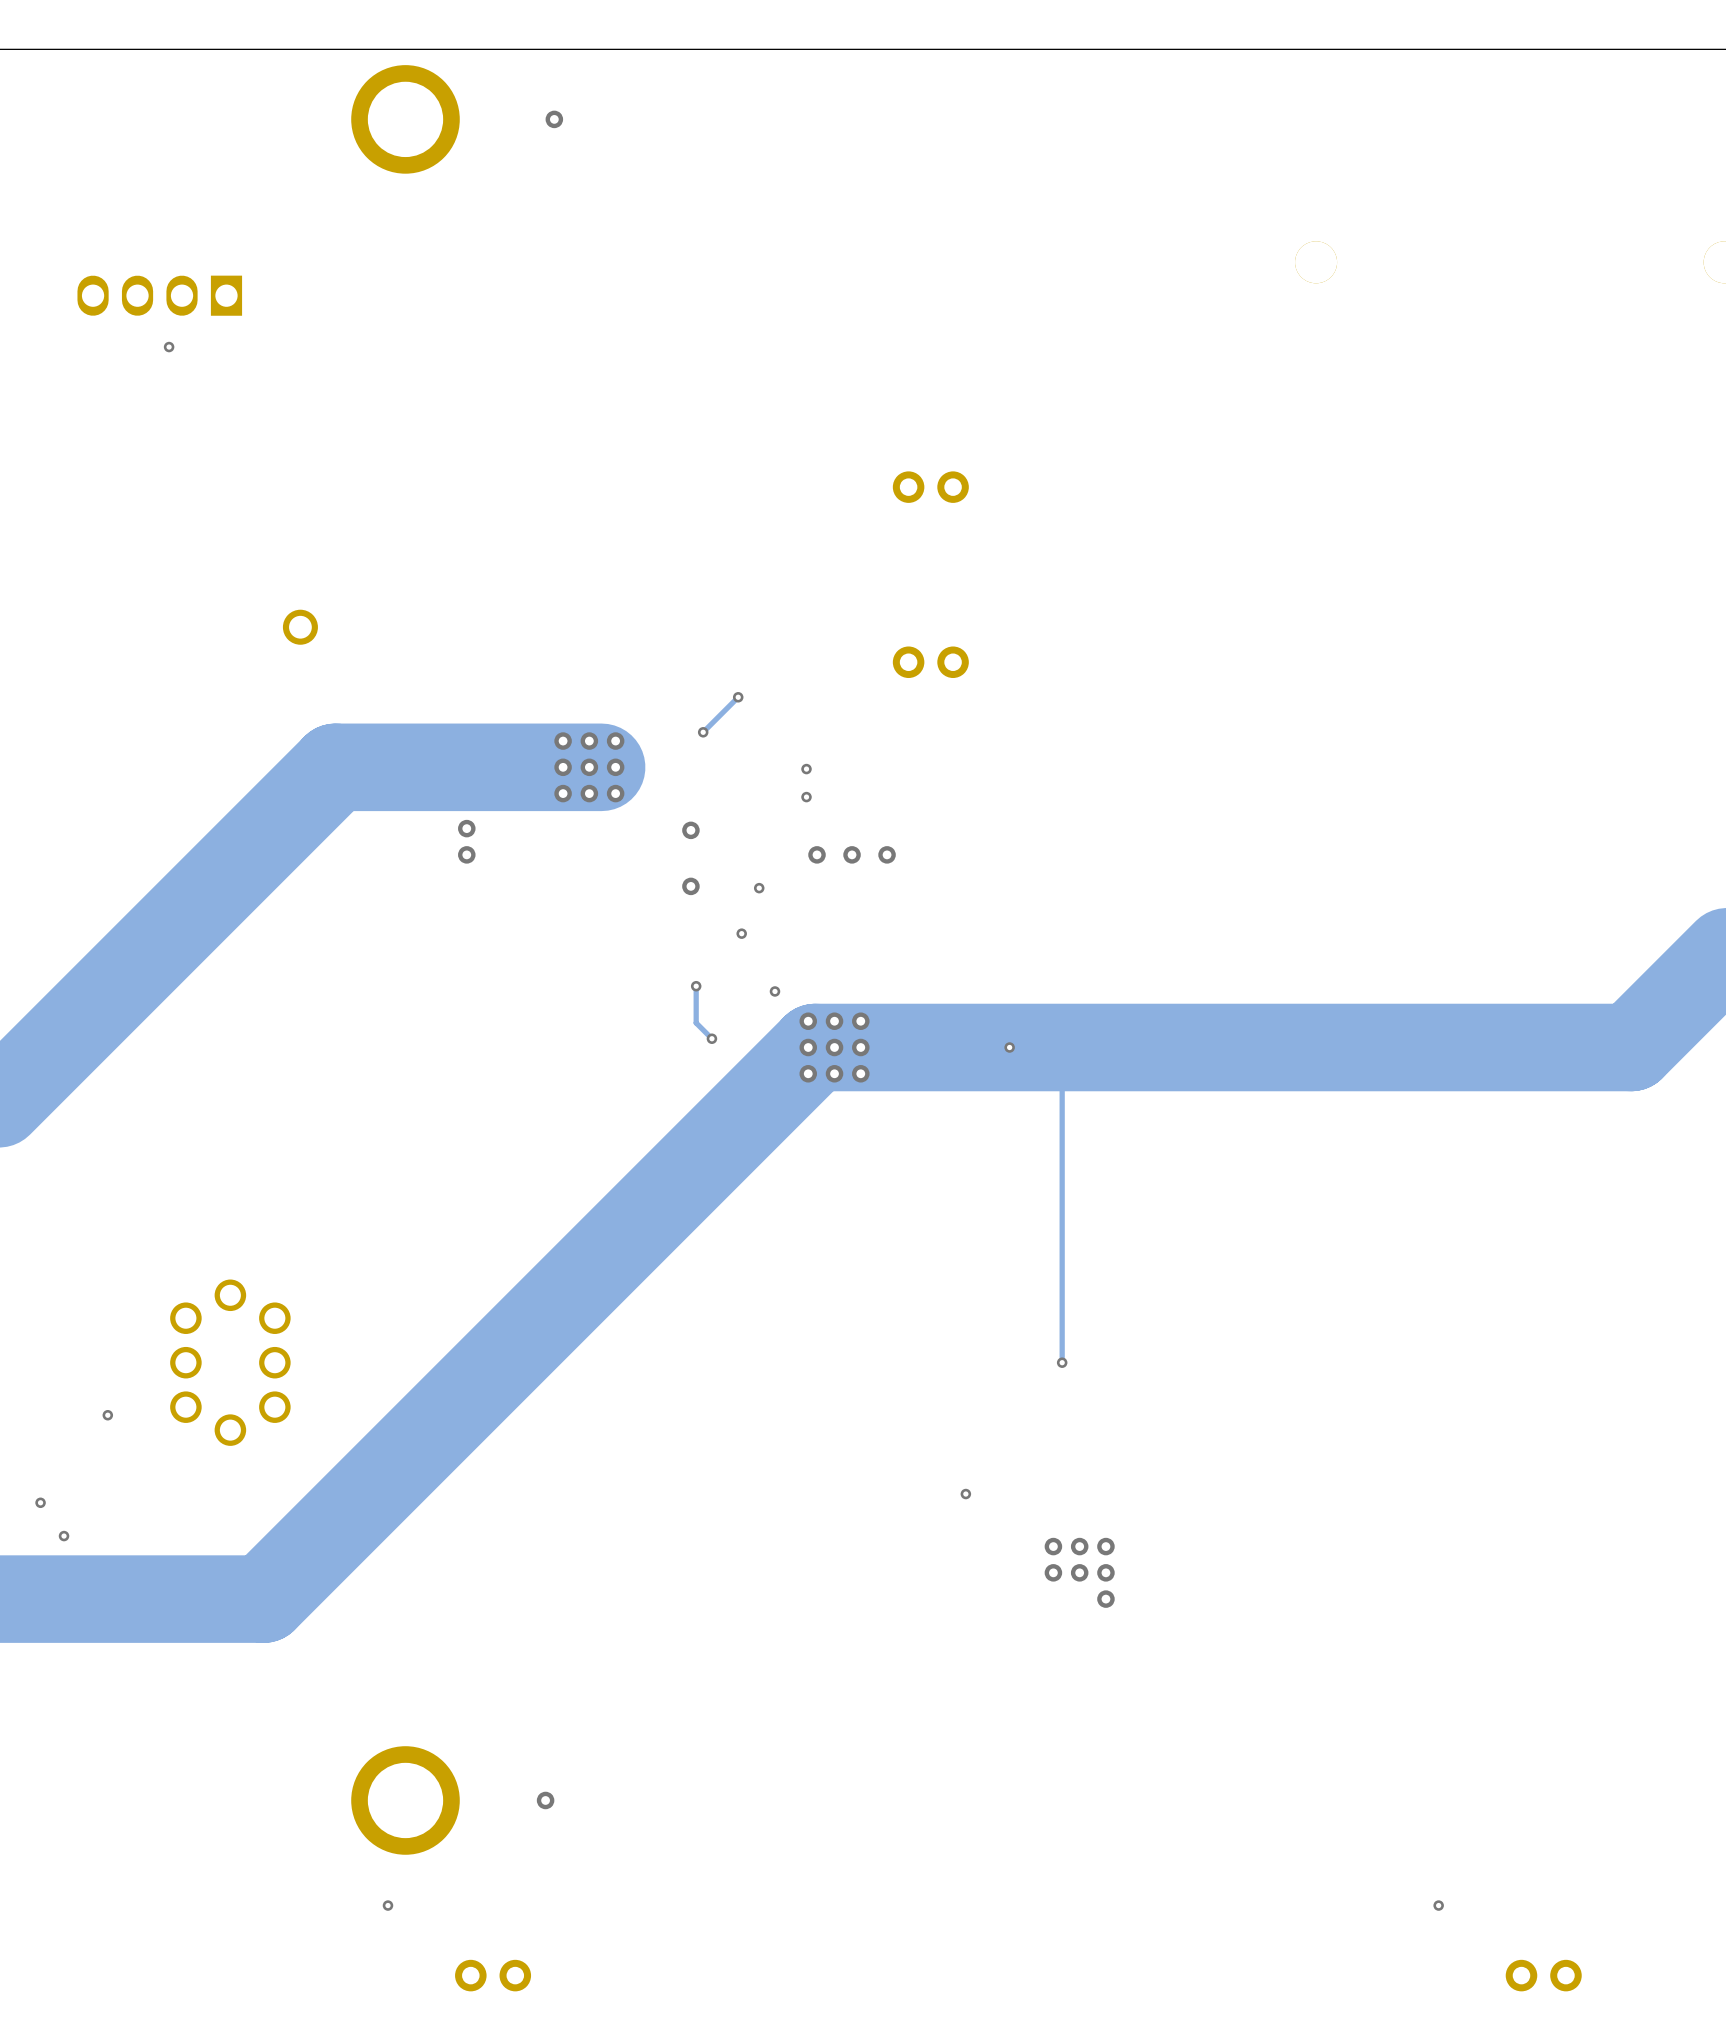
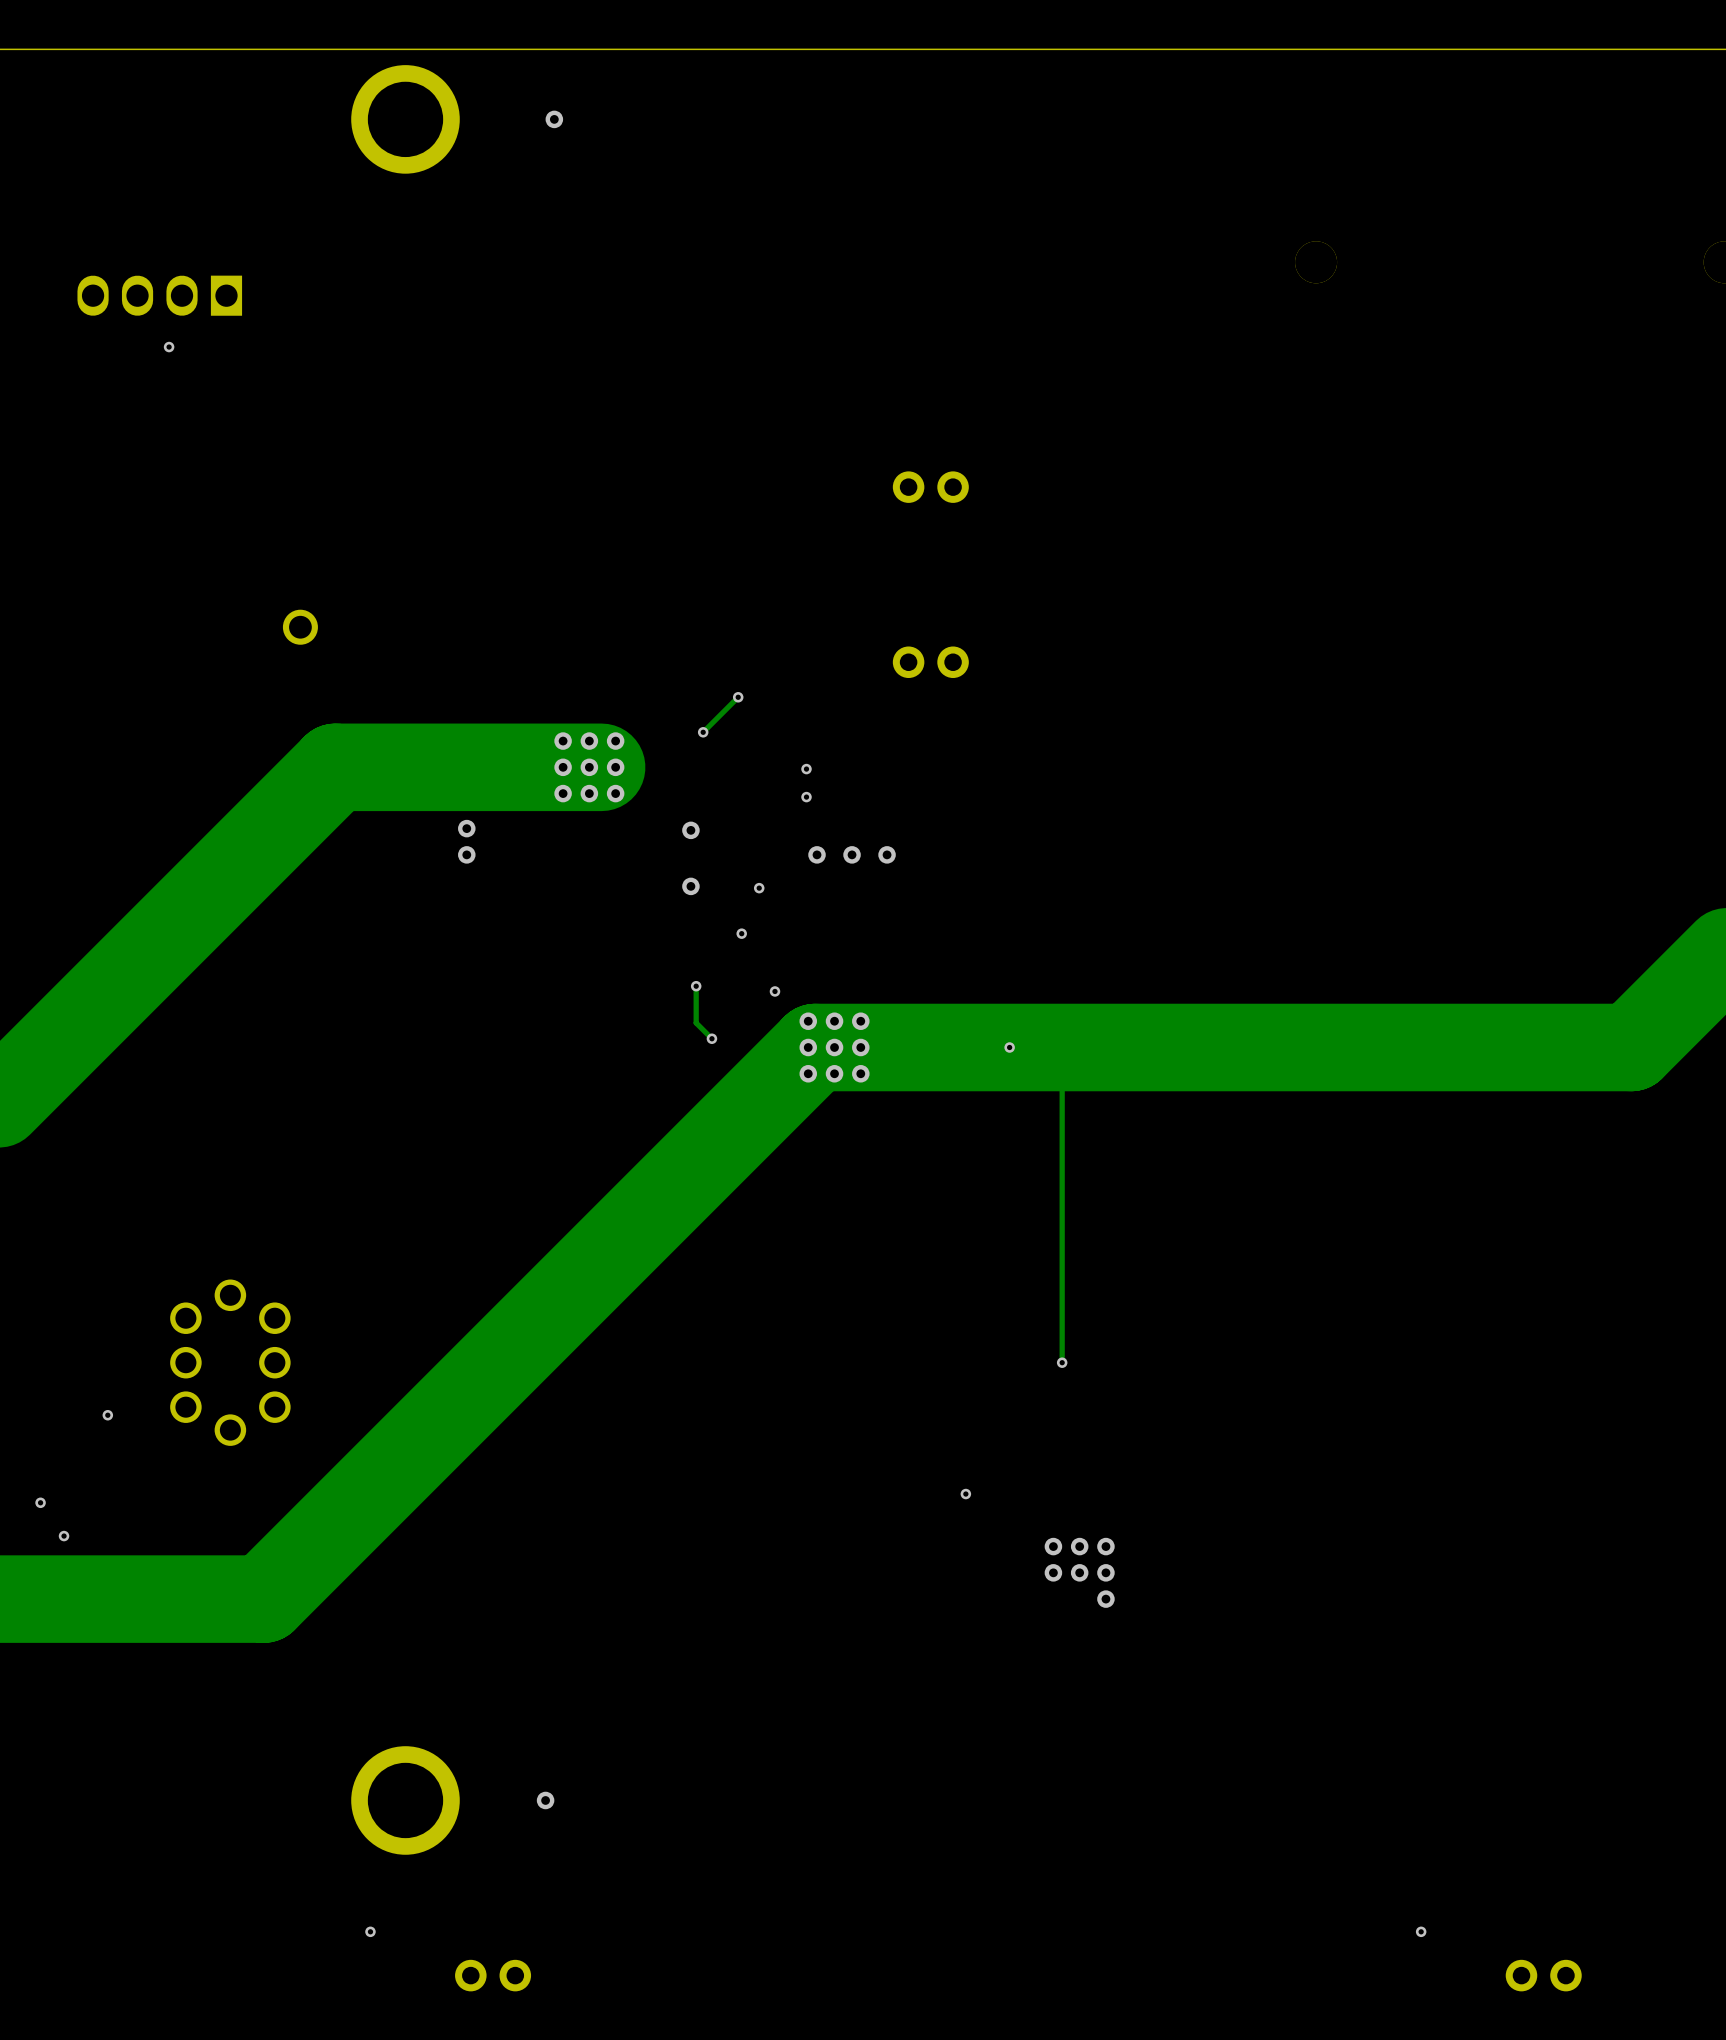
via position: (387, 1905) -> (370, 1931)
via position: (1438, 1905) -> (1421, 1931)

